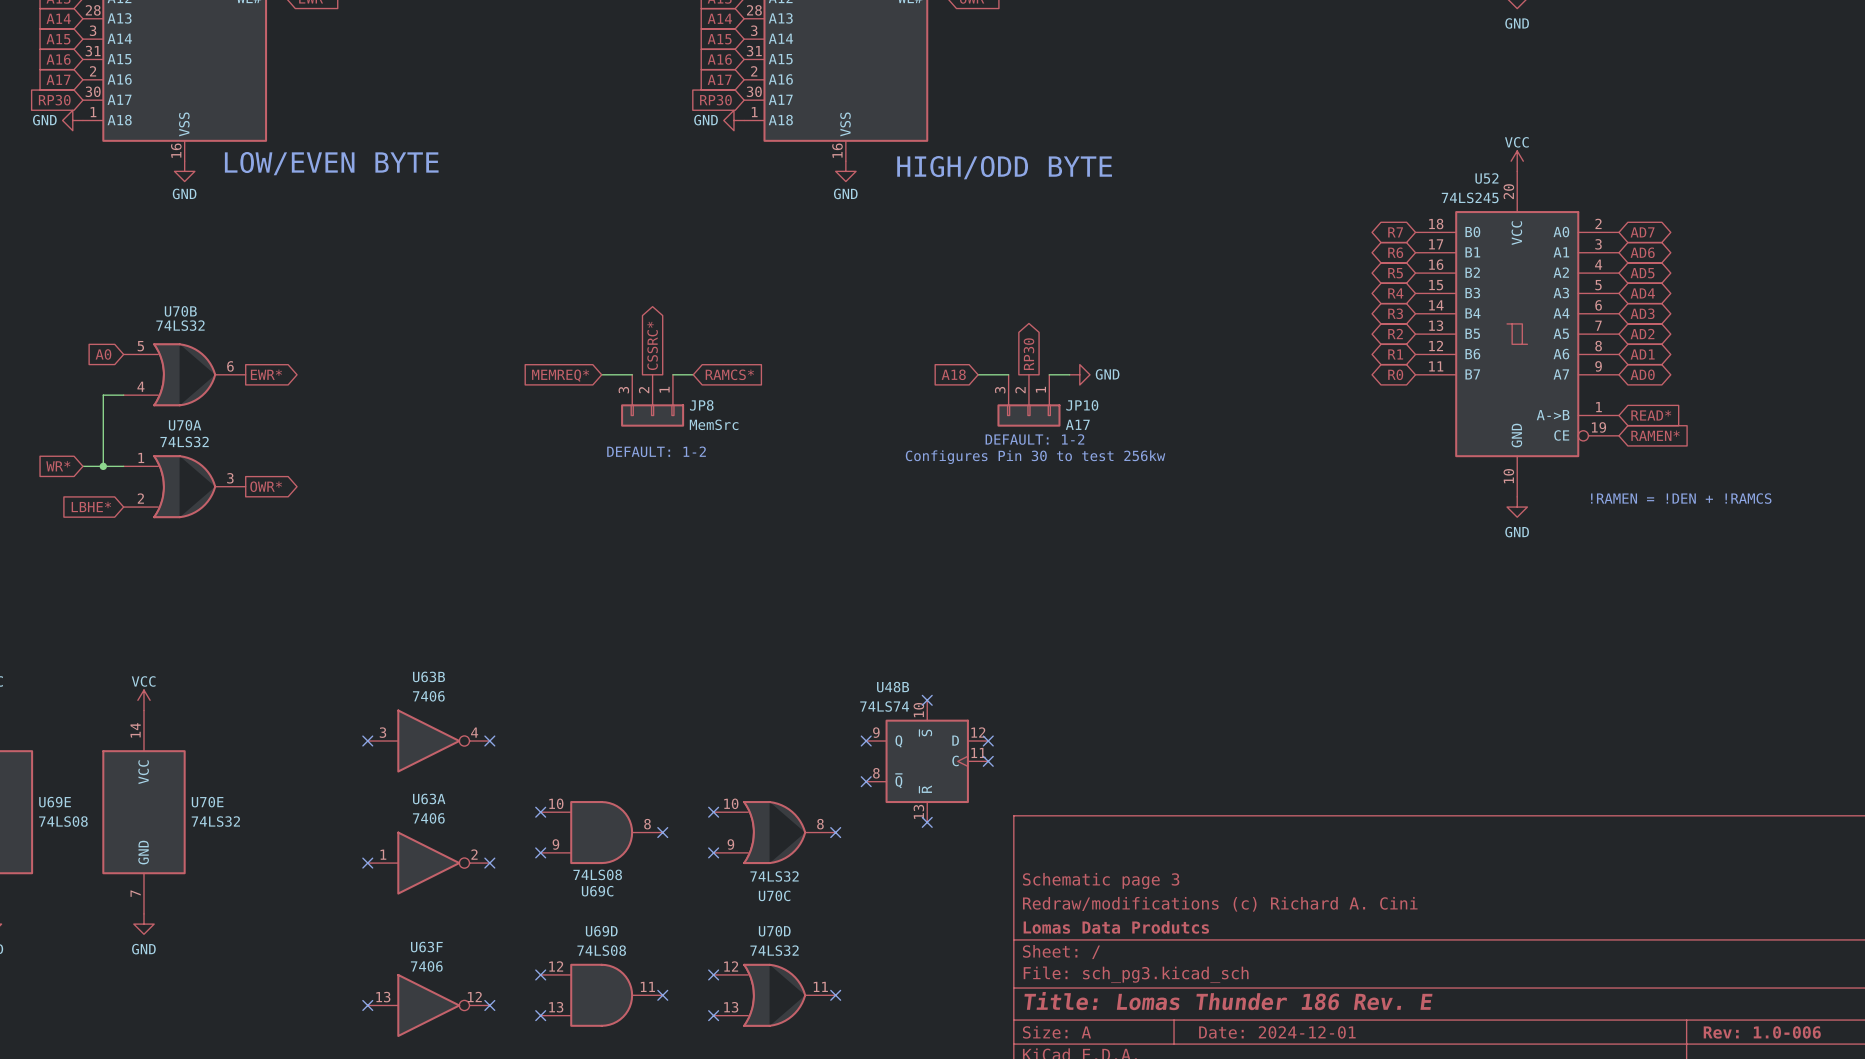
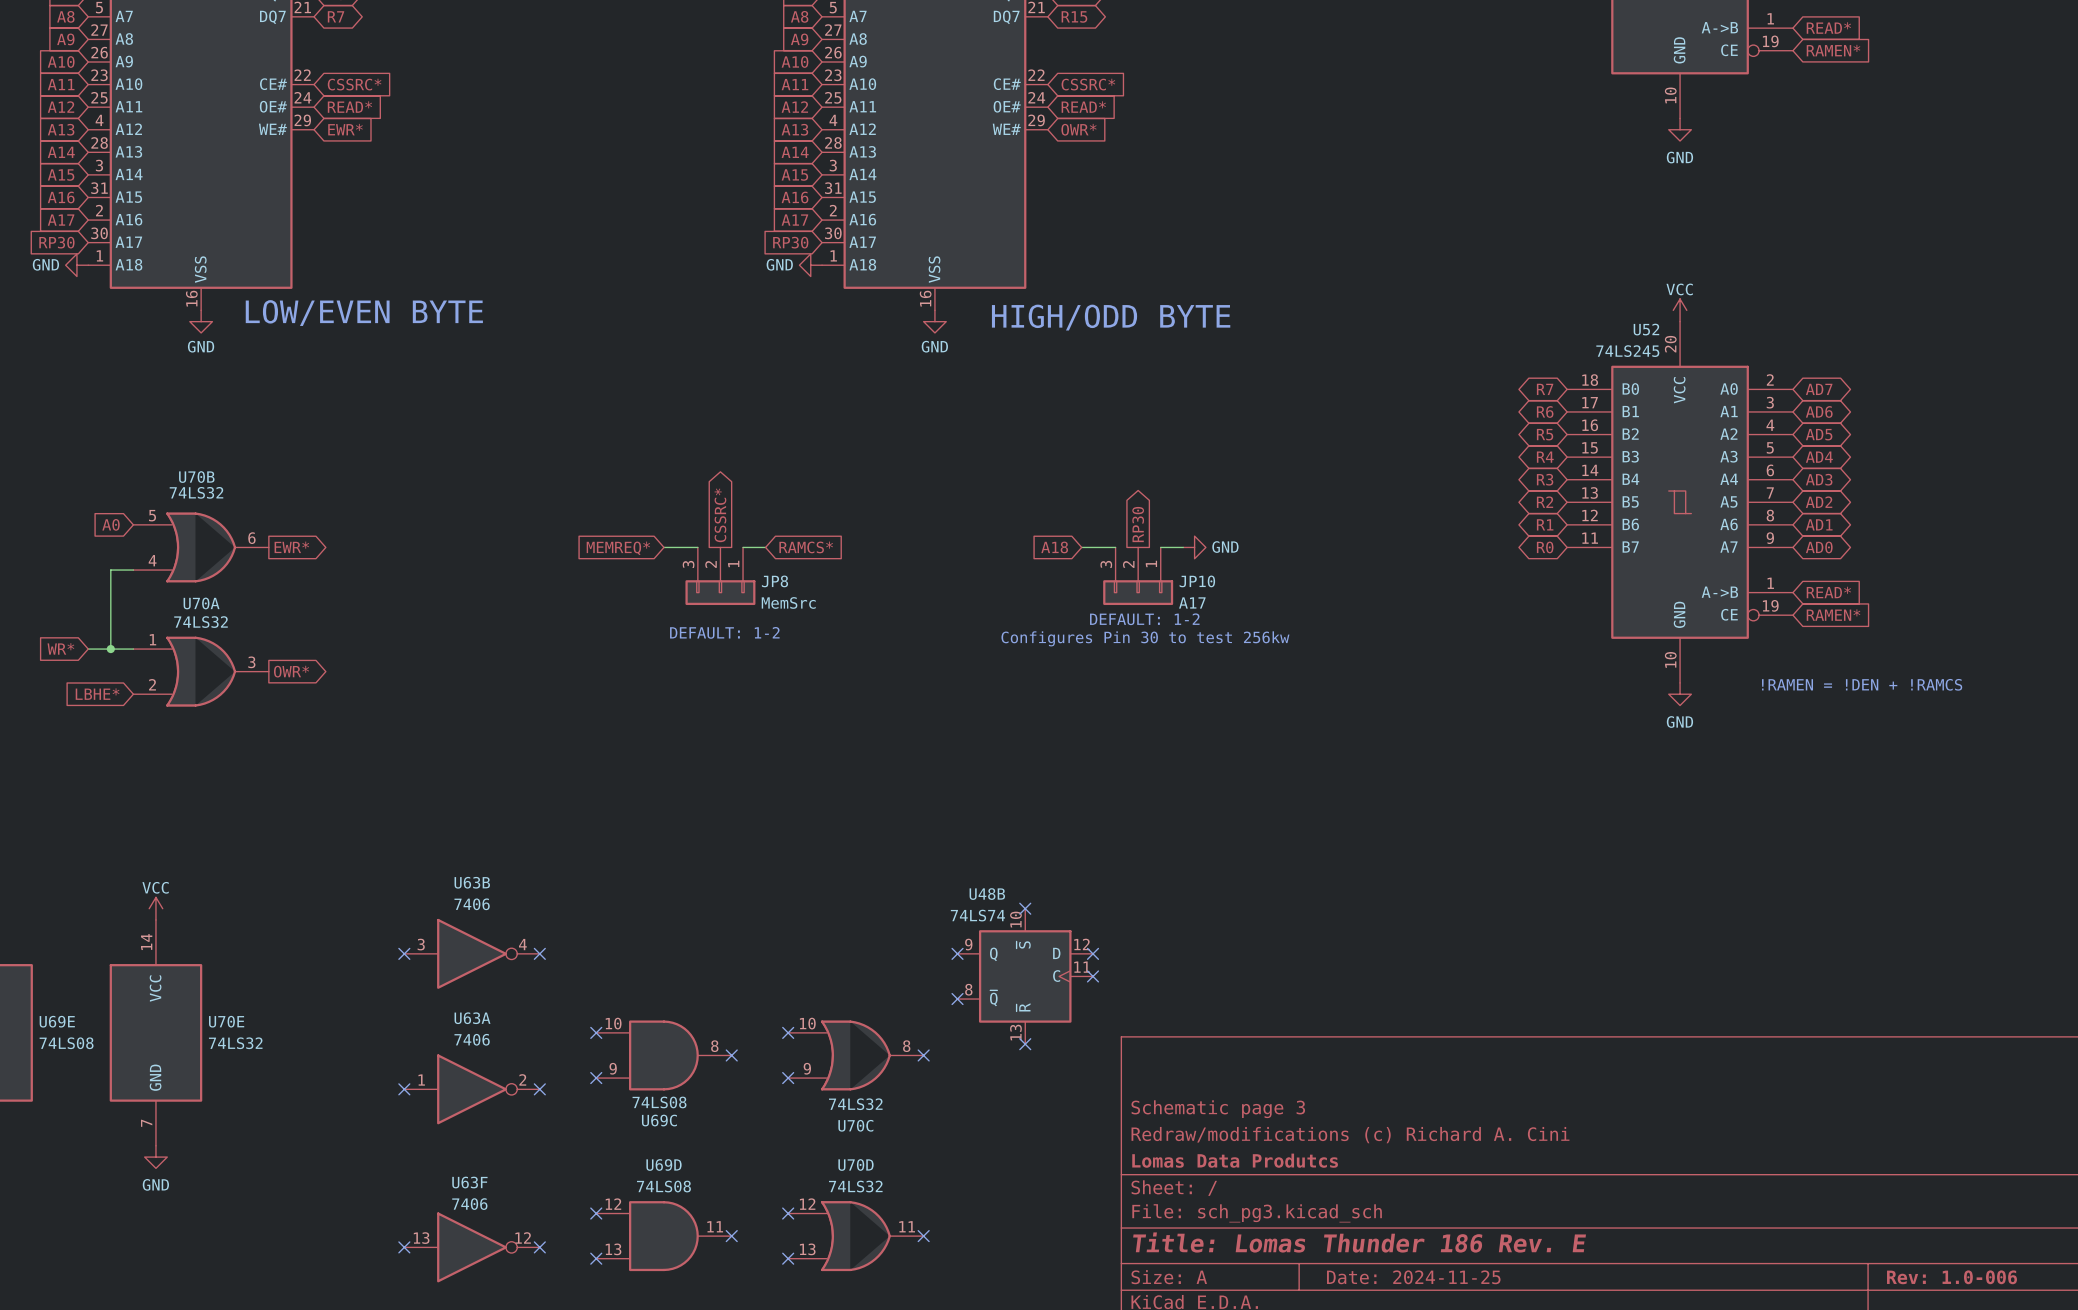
title block: Date: 2024-12-01 (1277, 1032) -> Date: 2024-11-25 (1413, 1277)

